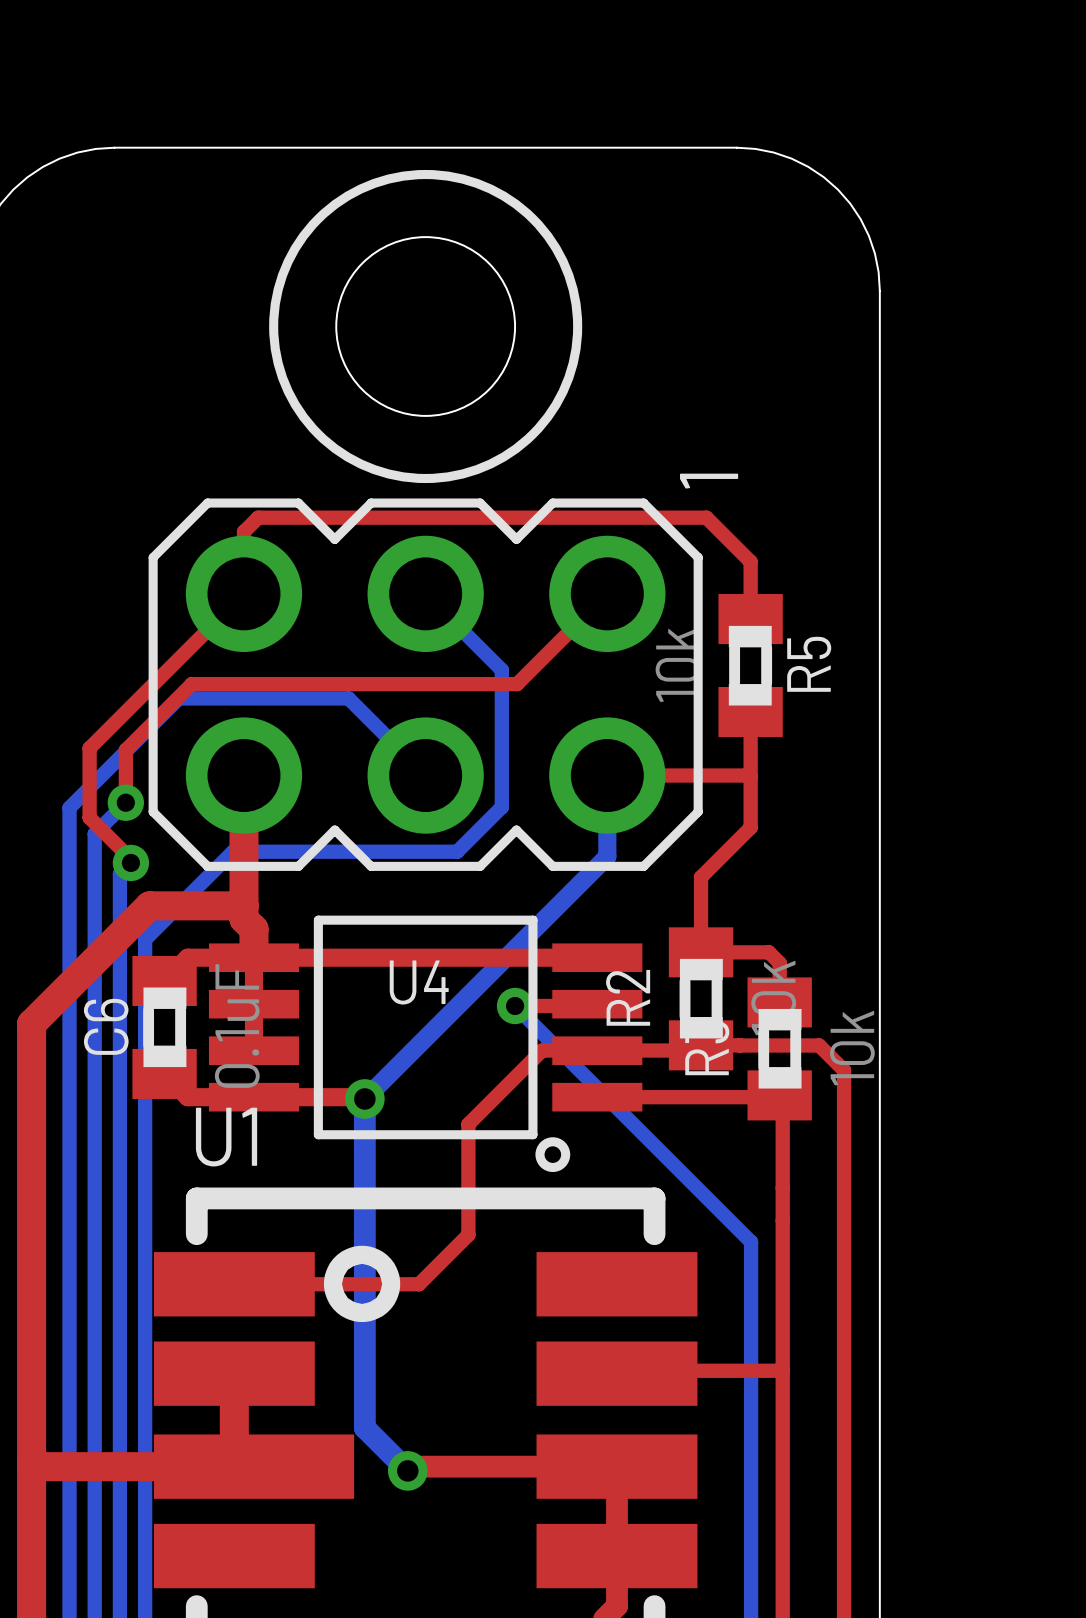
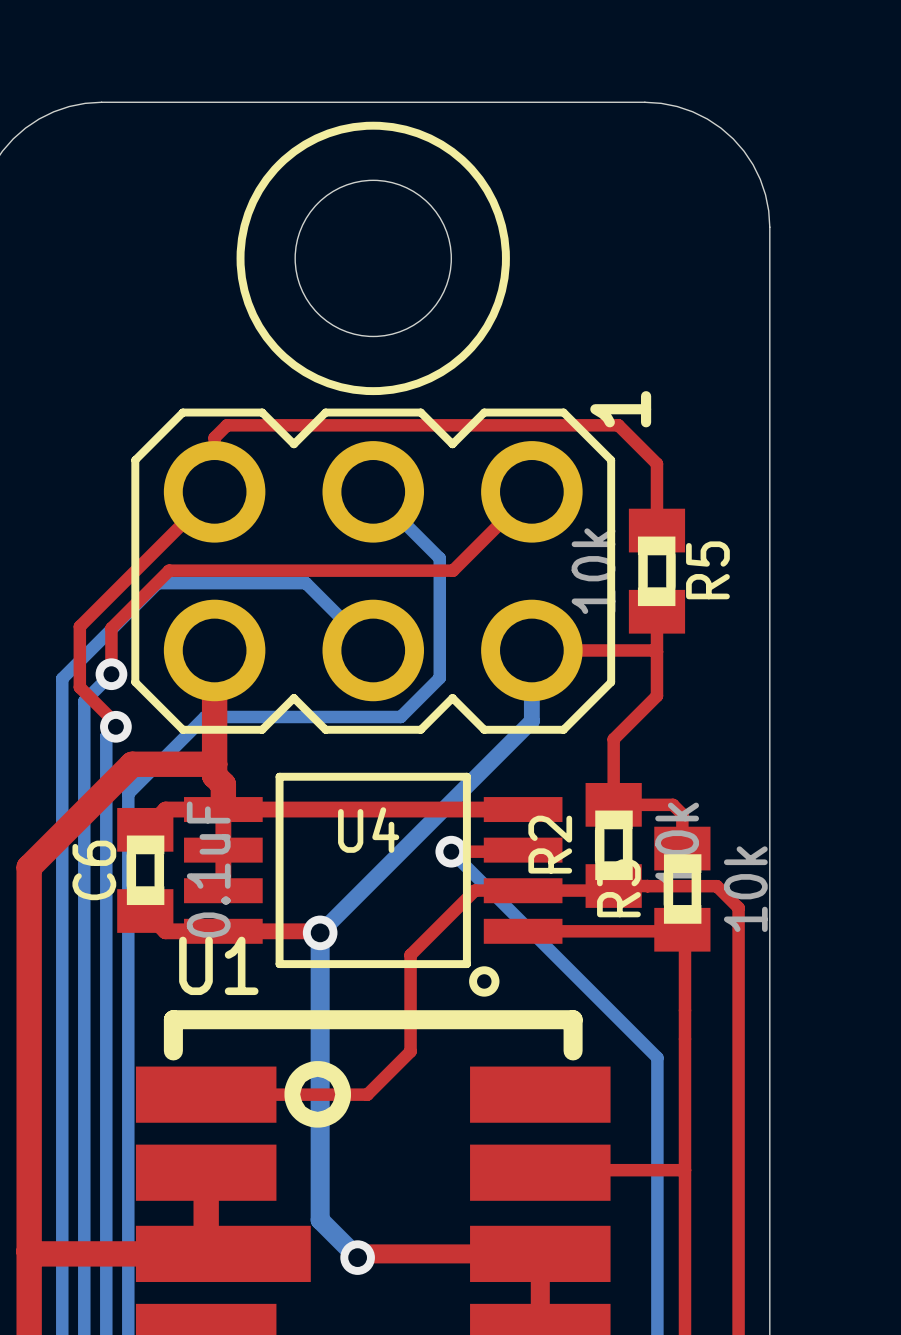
R5 position: (750, 665) -> (656, 571)

